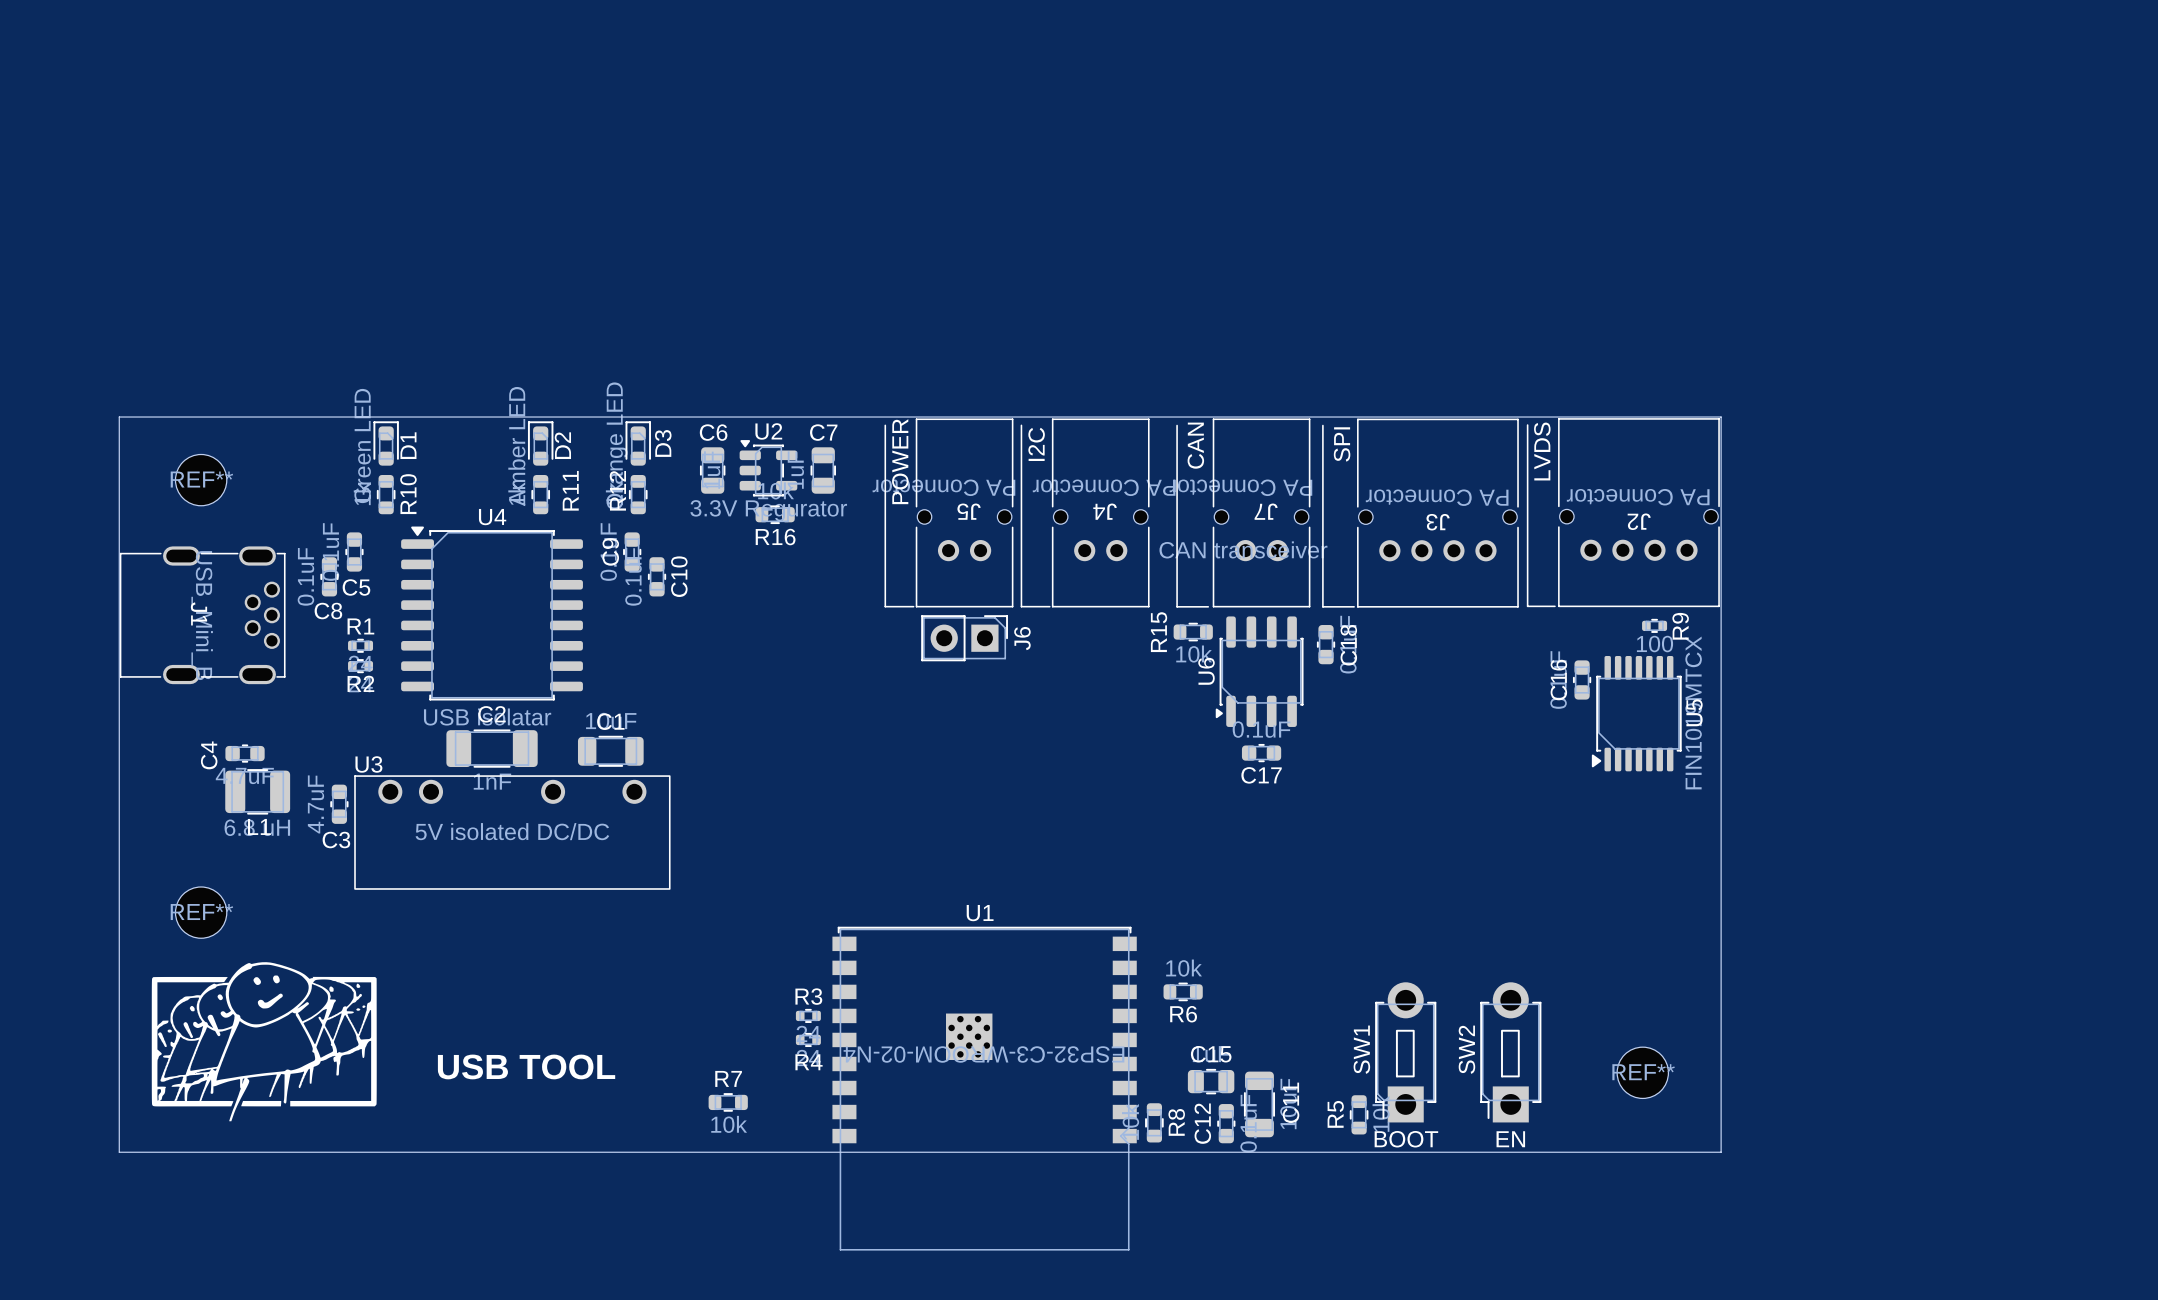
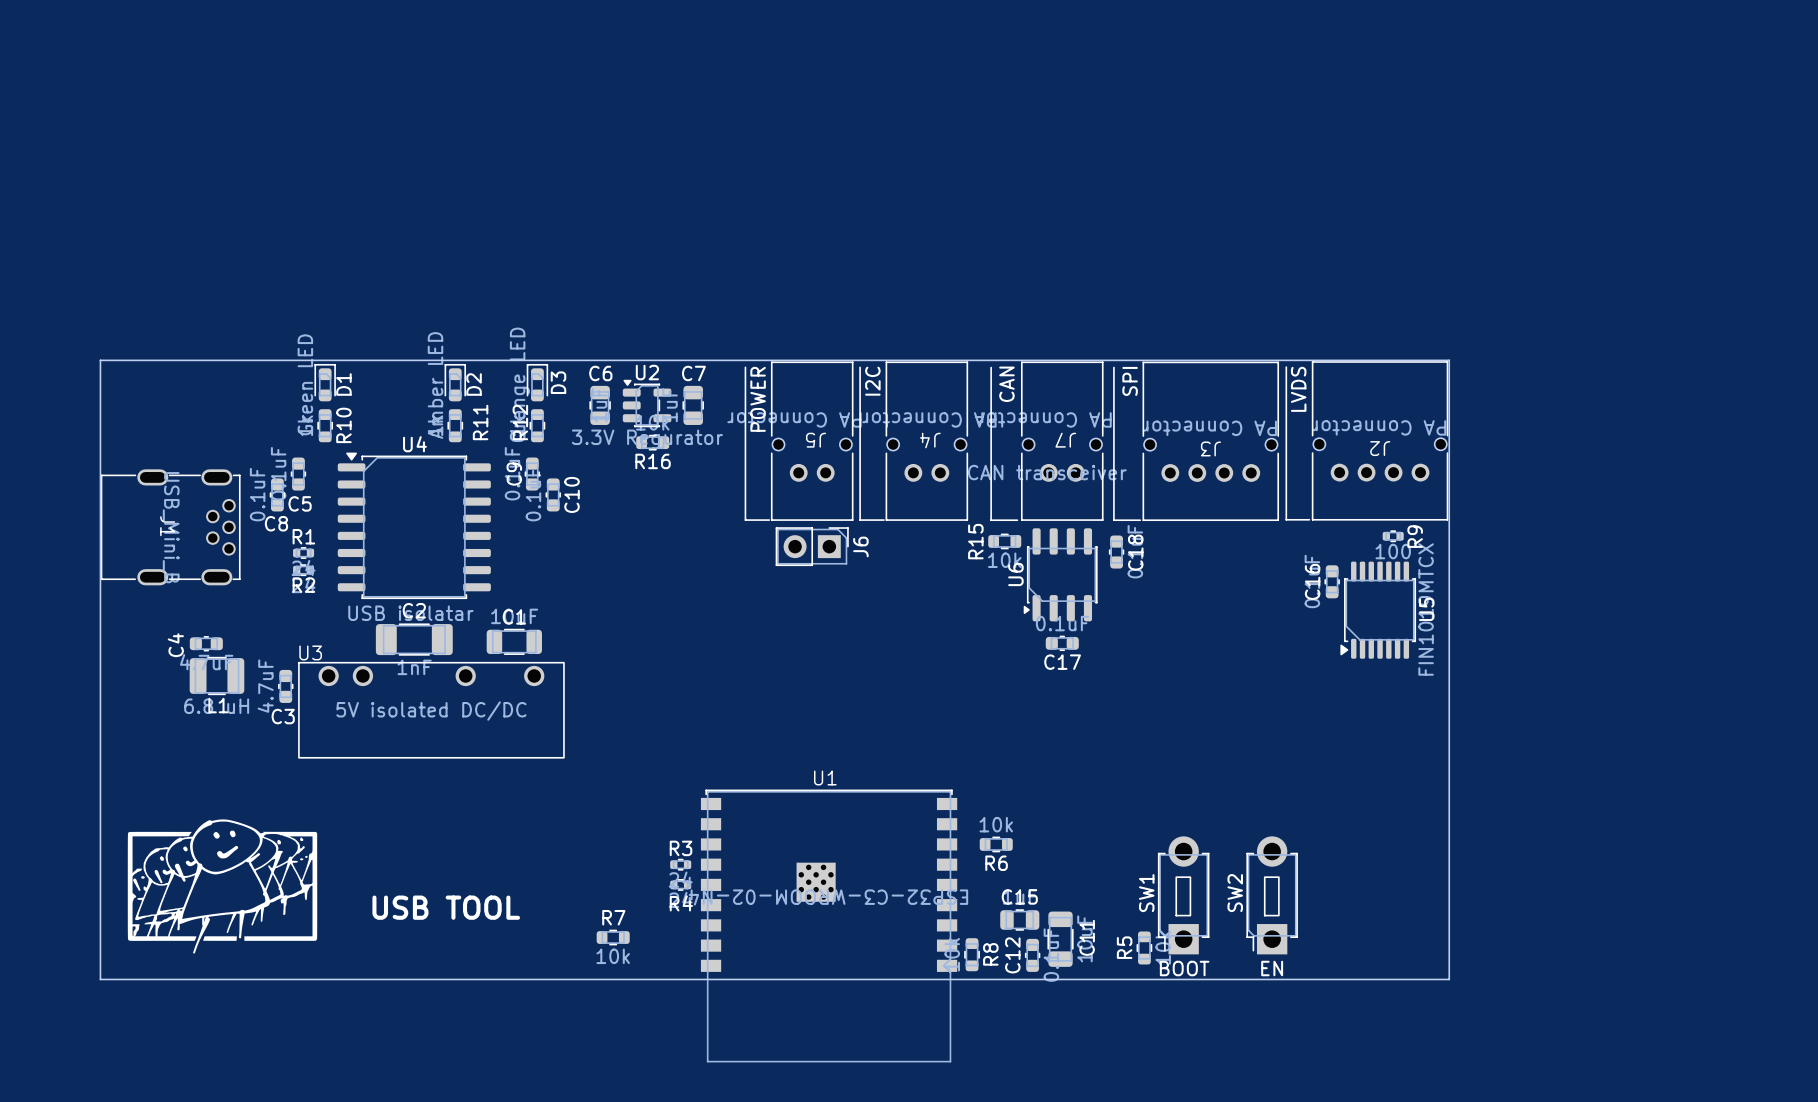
REF**: (201, 480) -> none
REF**: (201, 912) -> none
REF**: (1642, 1072) -> none

